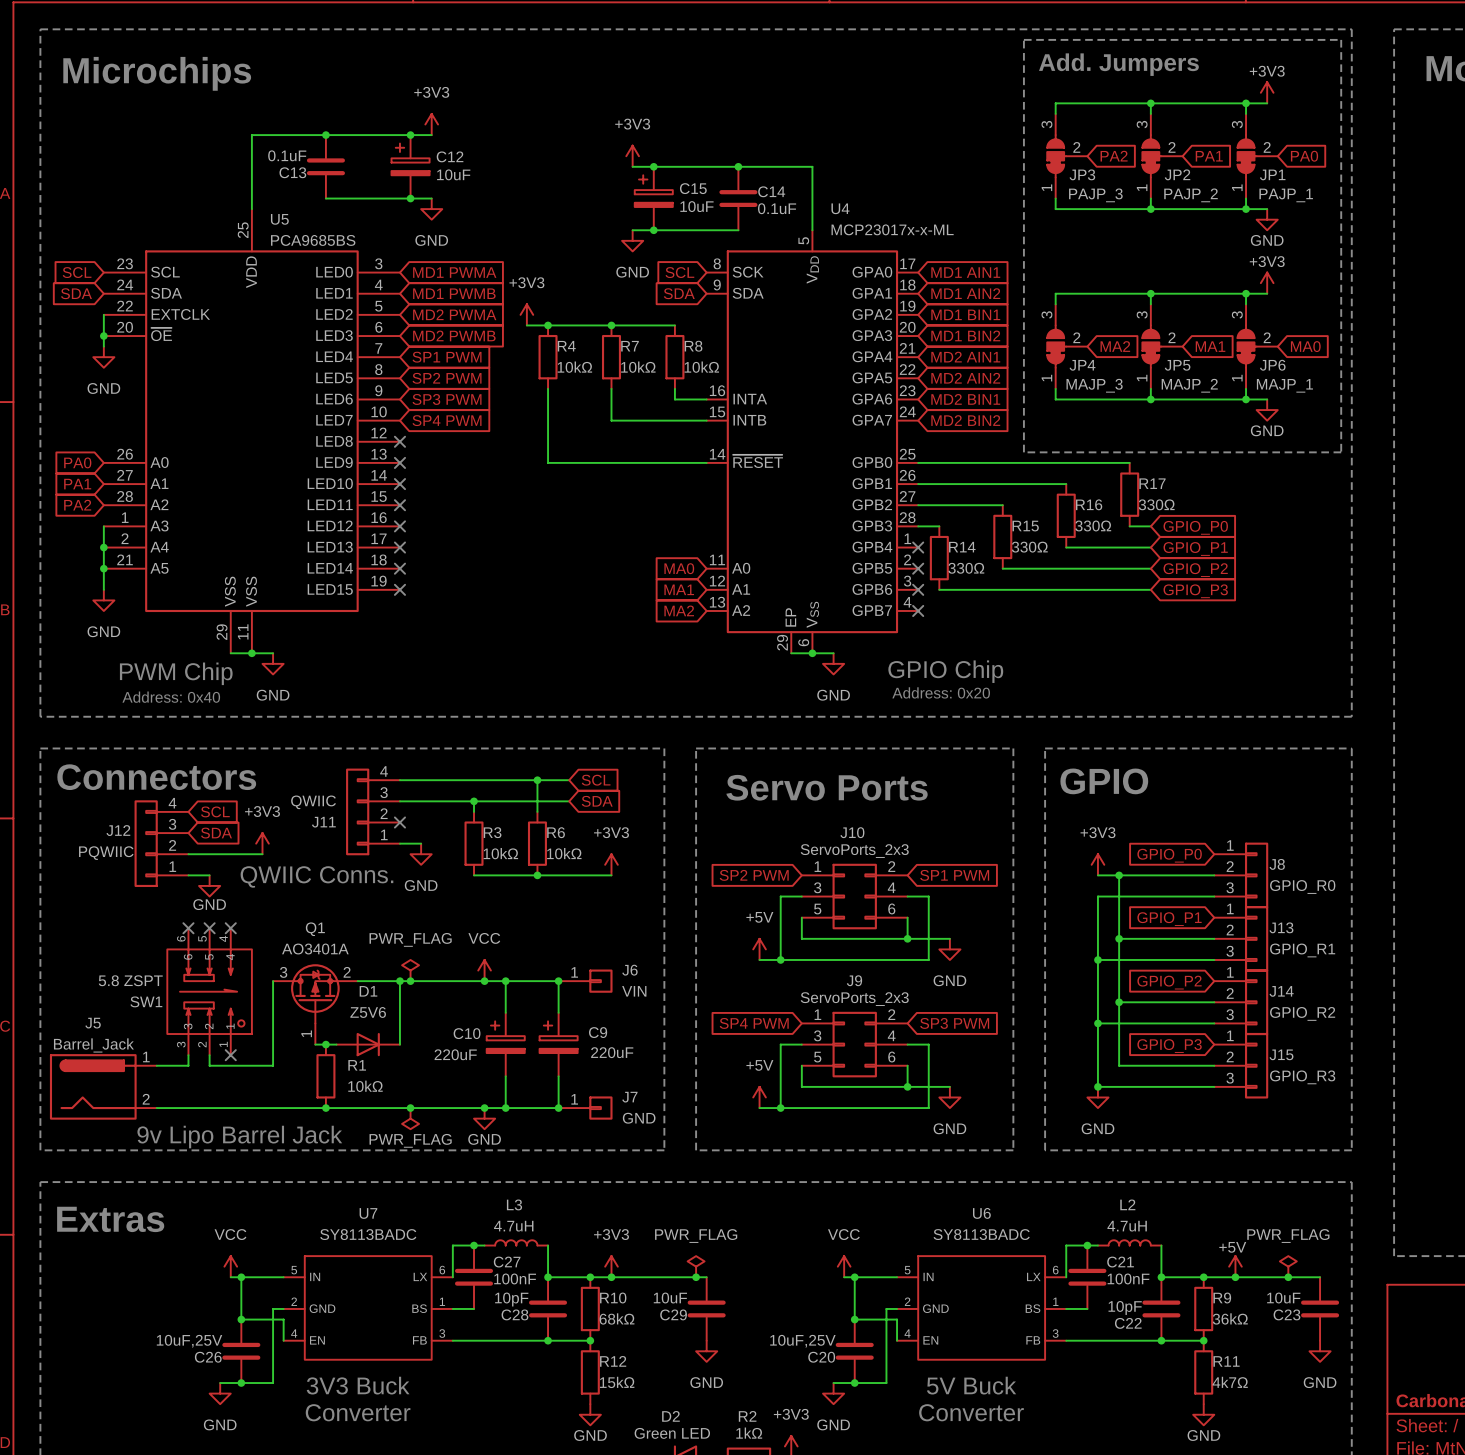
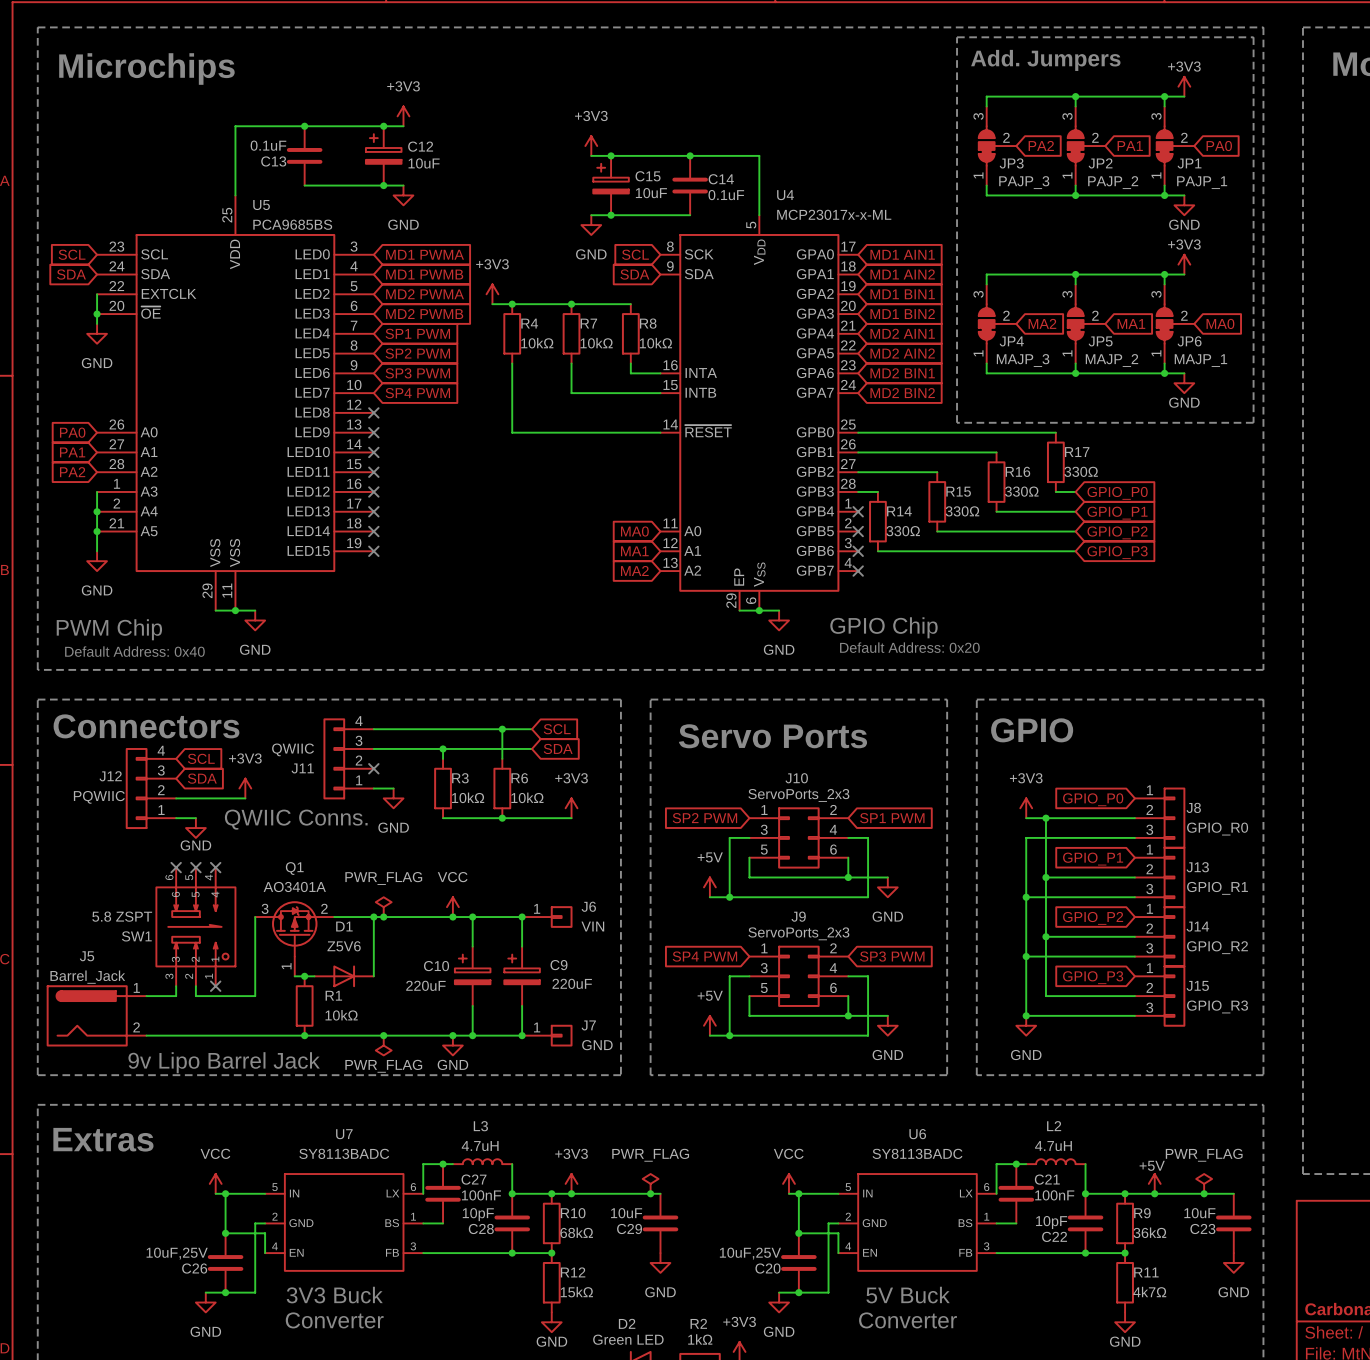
text position: PWM Chip (176, 673) -> PWM Chip (109, 629)
text: Address: 0x20 (941, 692) -> Default Address: 0x20 (909, 647)
text: Address: 0x40 (171, 697) -> Default Address: 0x40 (134, 651)

